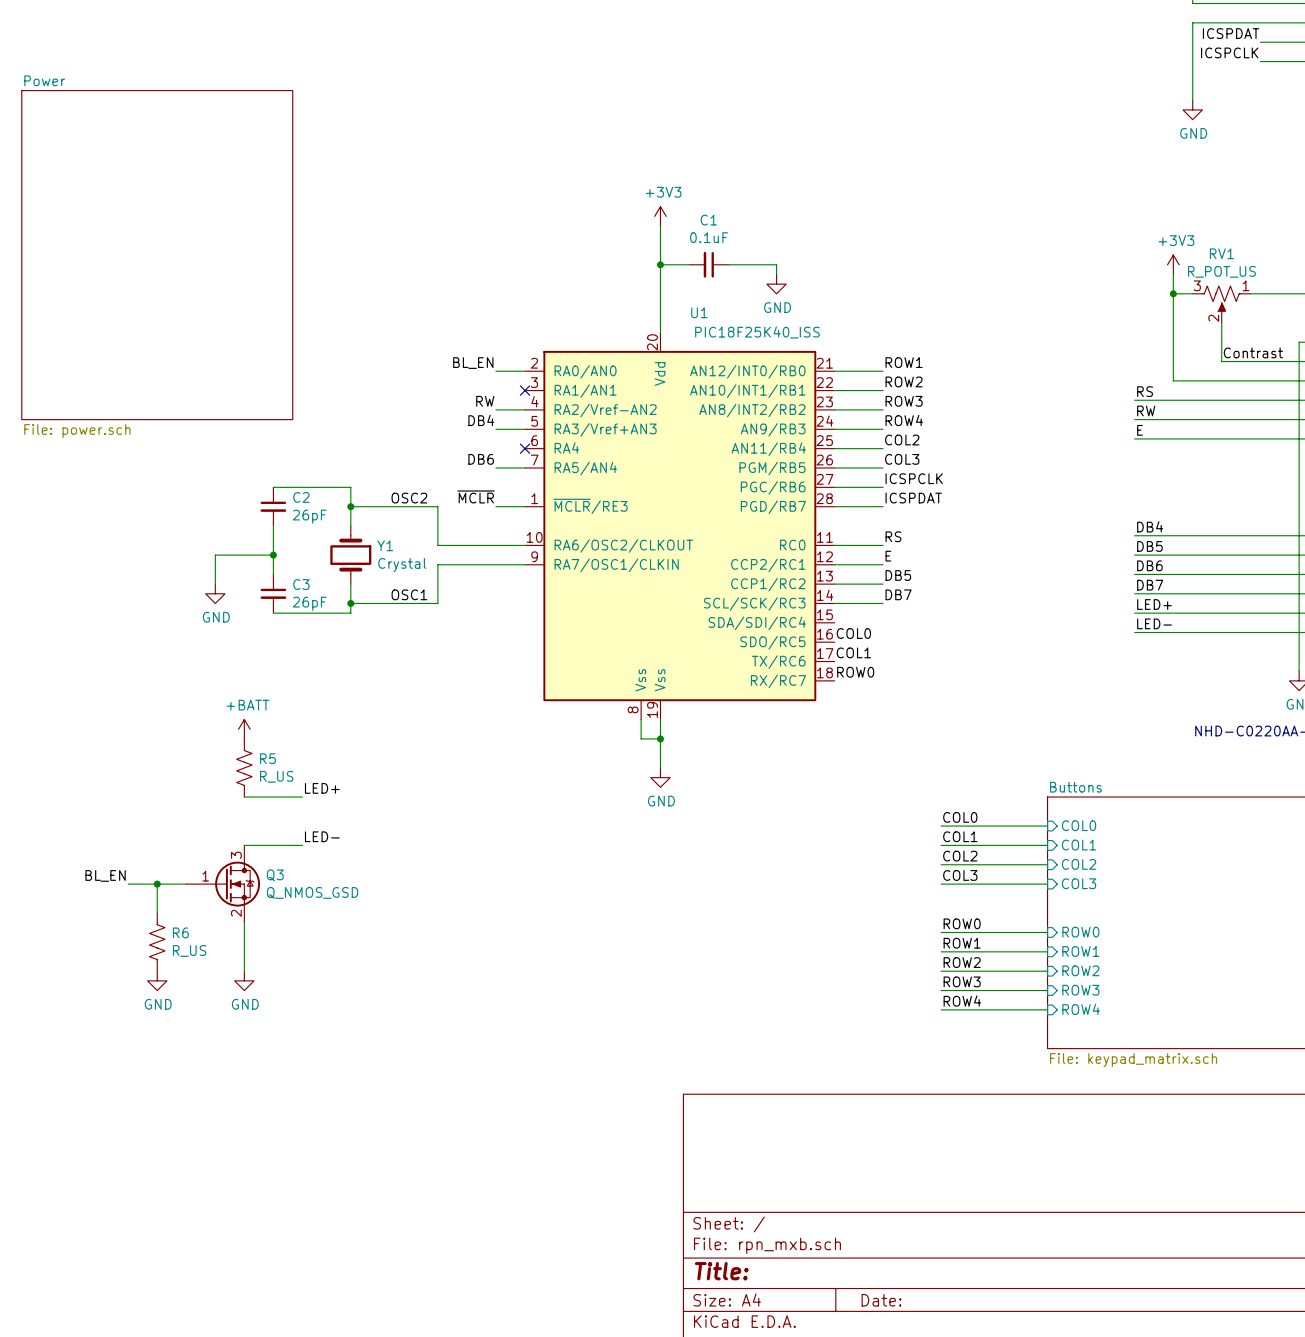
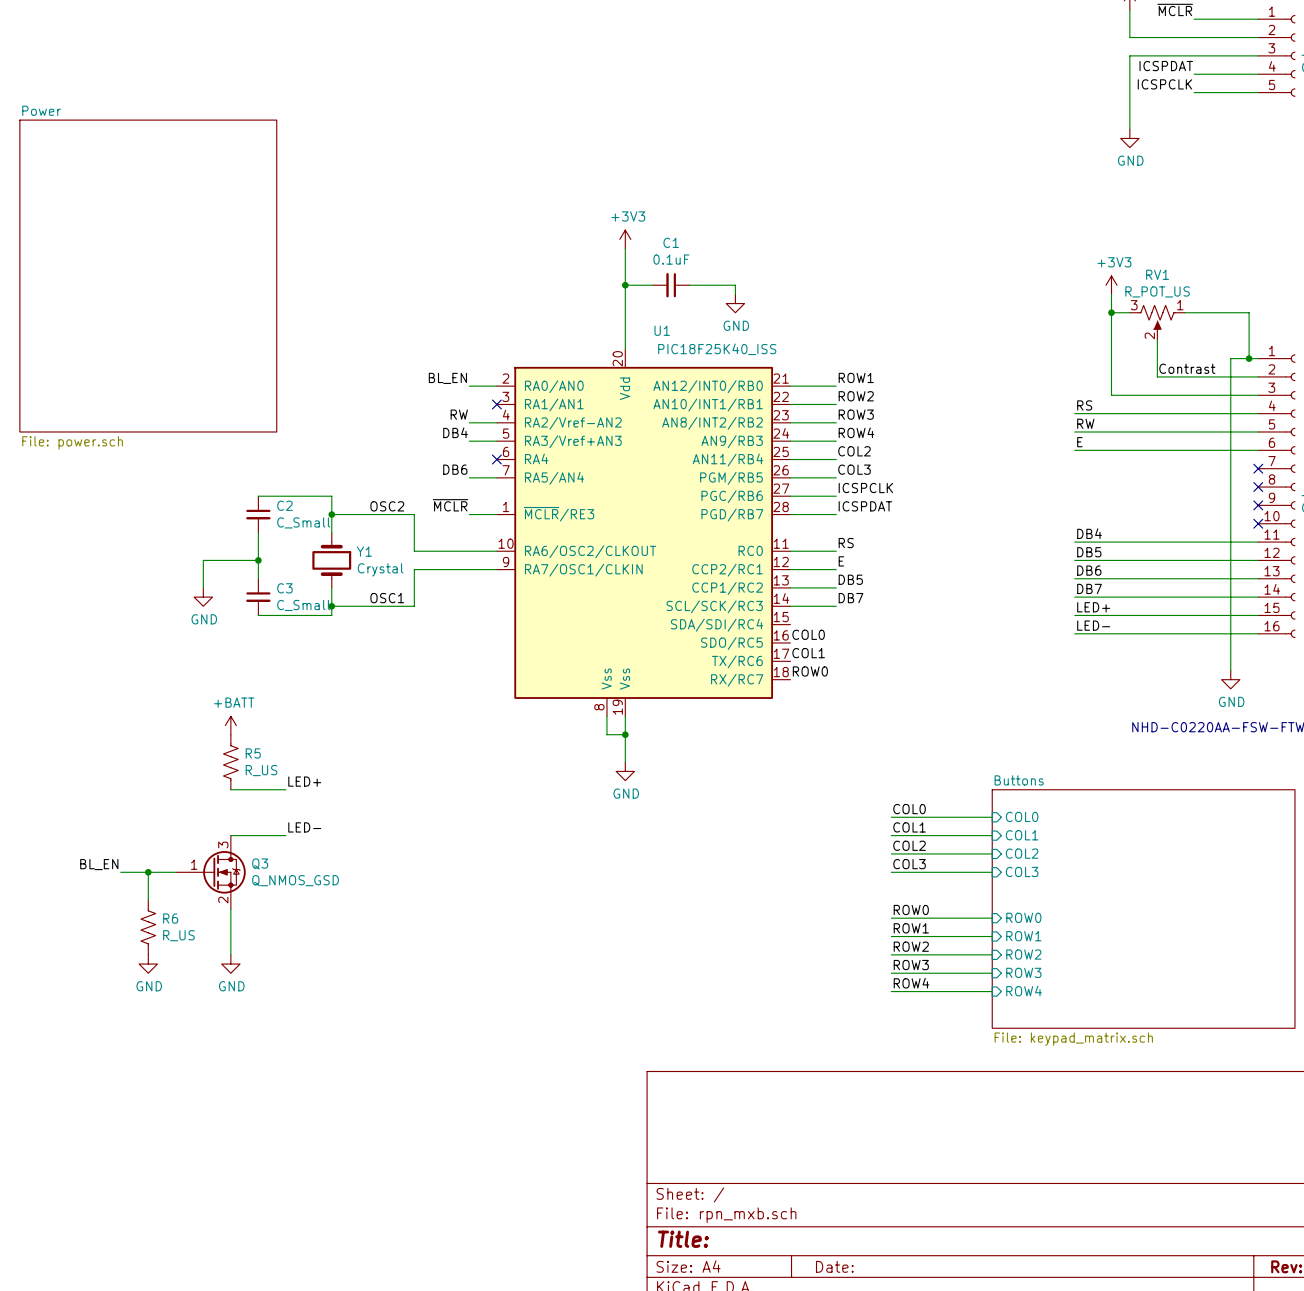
C2 value: 26pF (309, 516) -> C_Small (303, 522)
C3 value: 26pF (309, 603) -> C_Small (303, 605)

